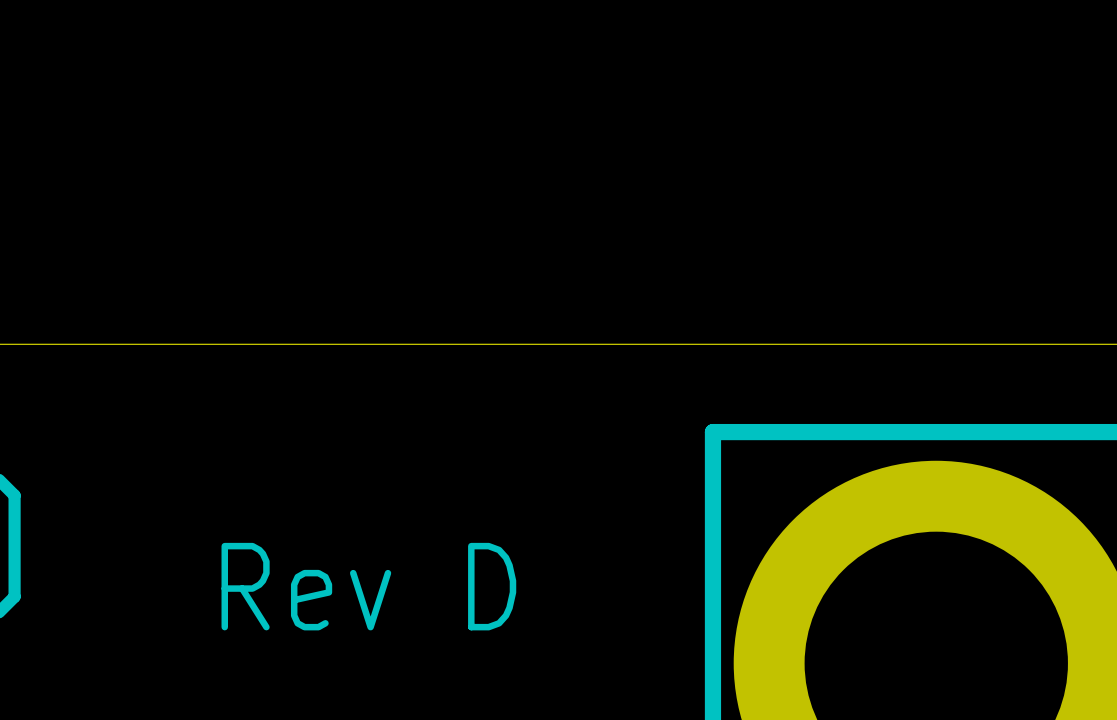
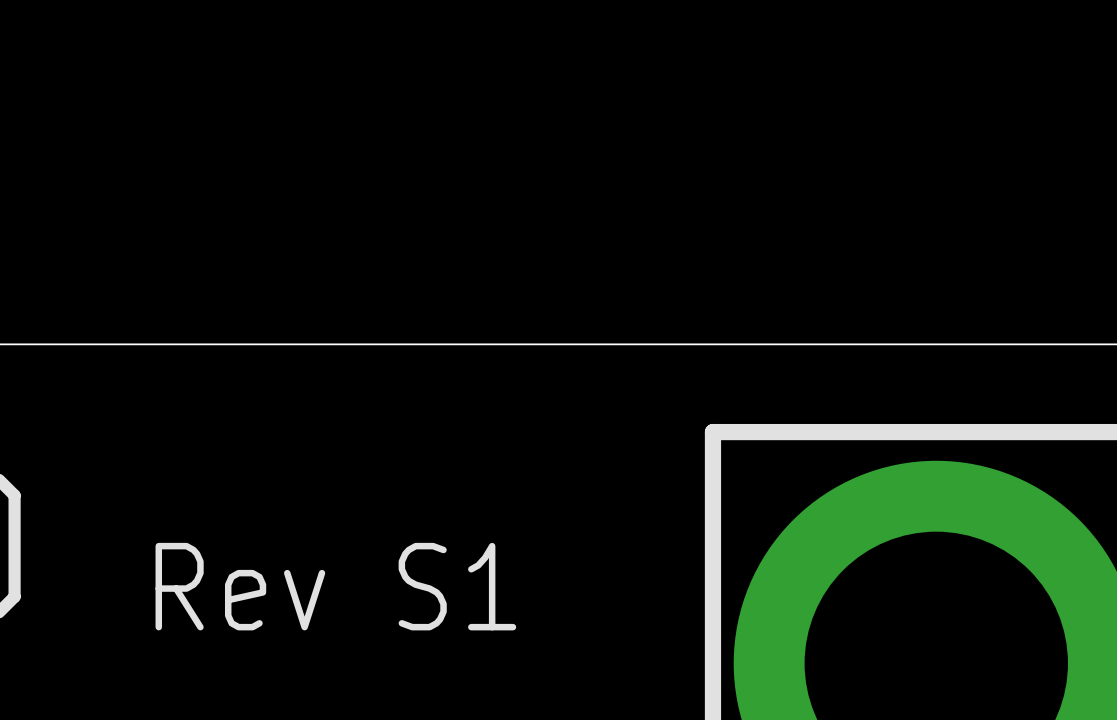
text: Rev D (368, 586) -> Rev S1 (335, 586)

